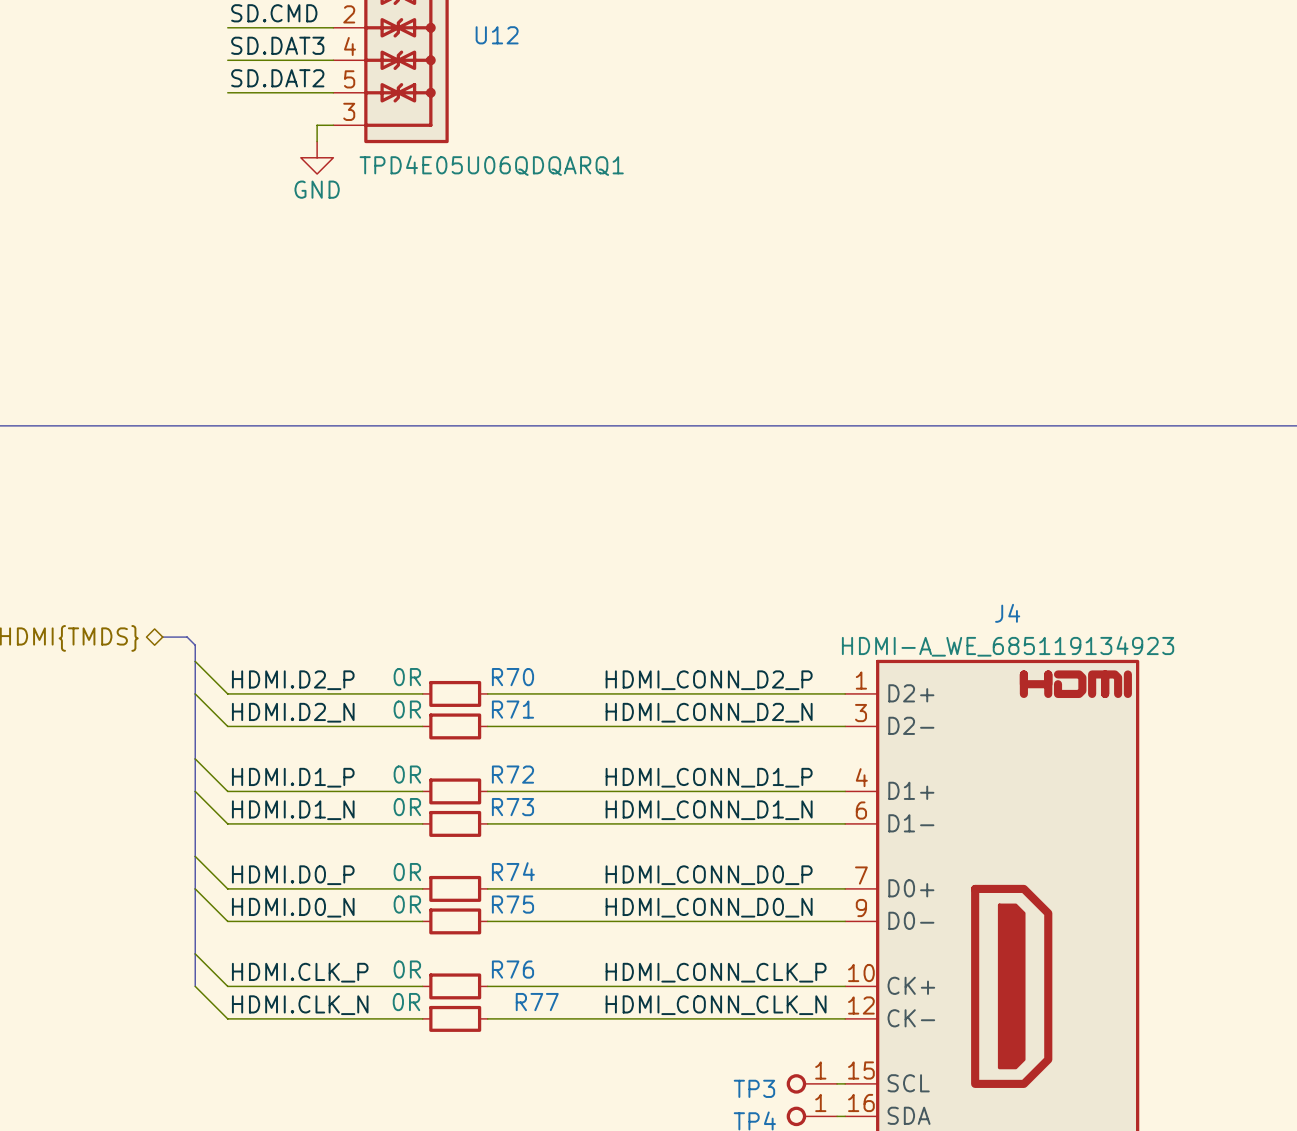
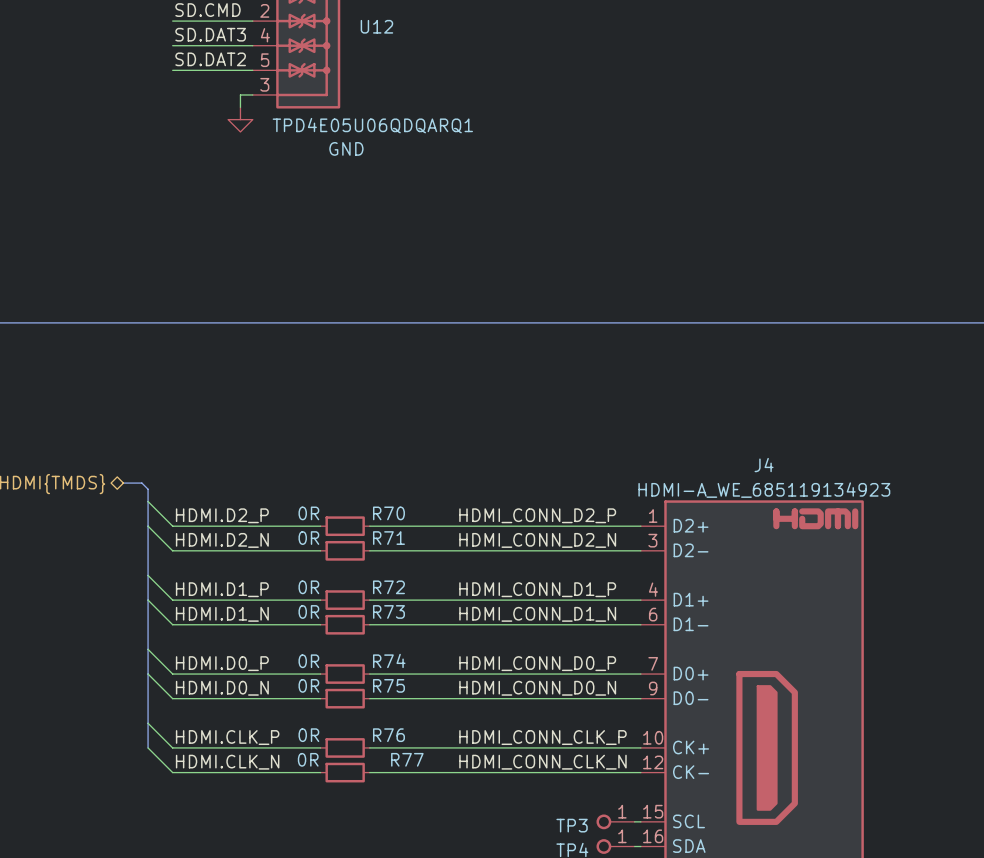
power symbol text position: GND (317, 189) -> GND (346, 148)

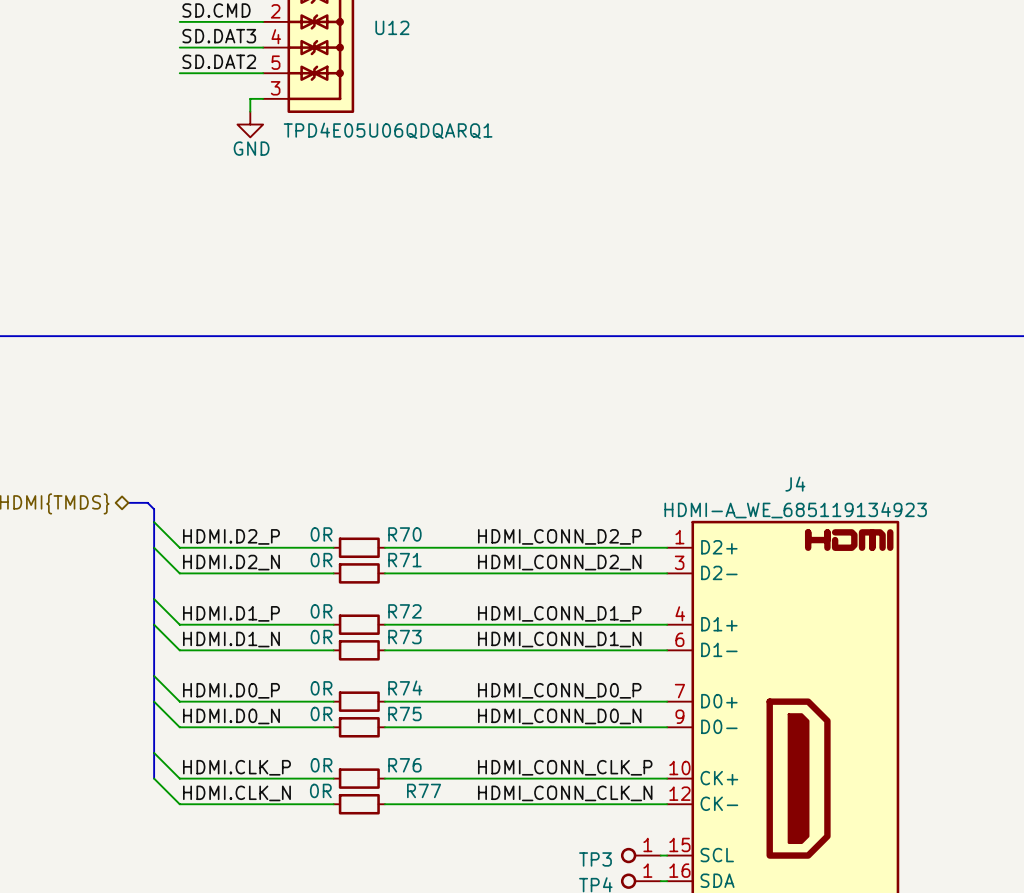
power symbol text position: GND (346, 148) -> GND (251, 148)

